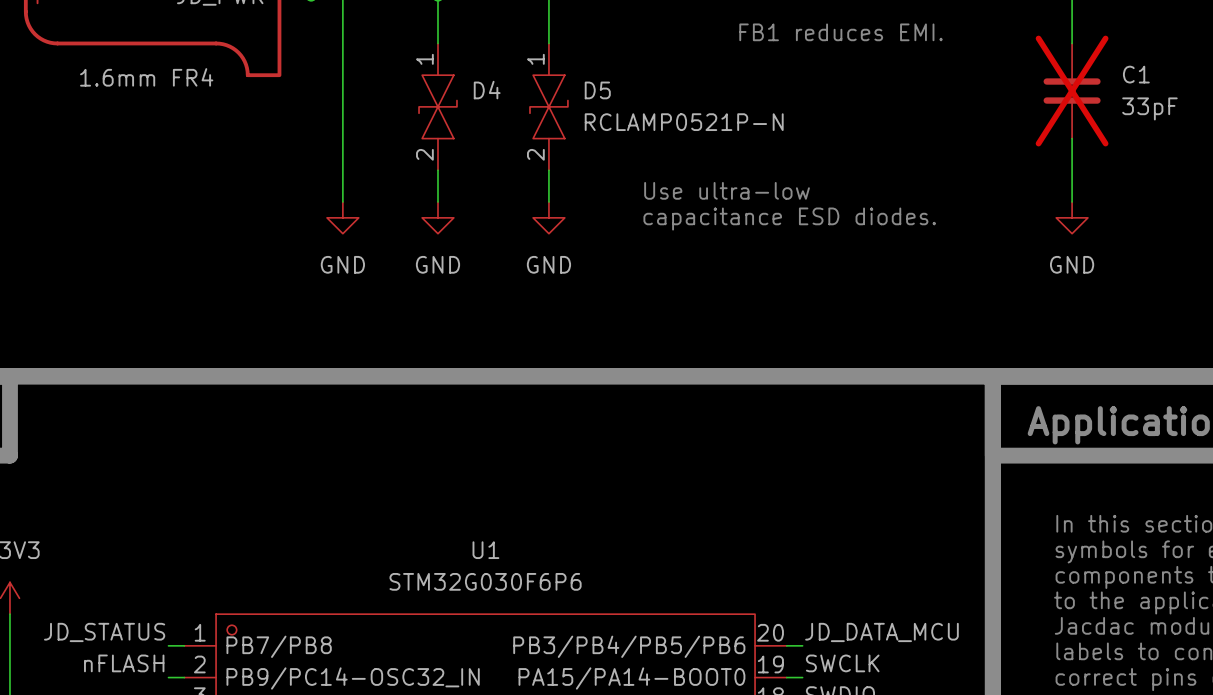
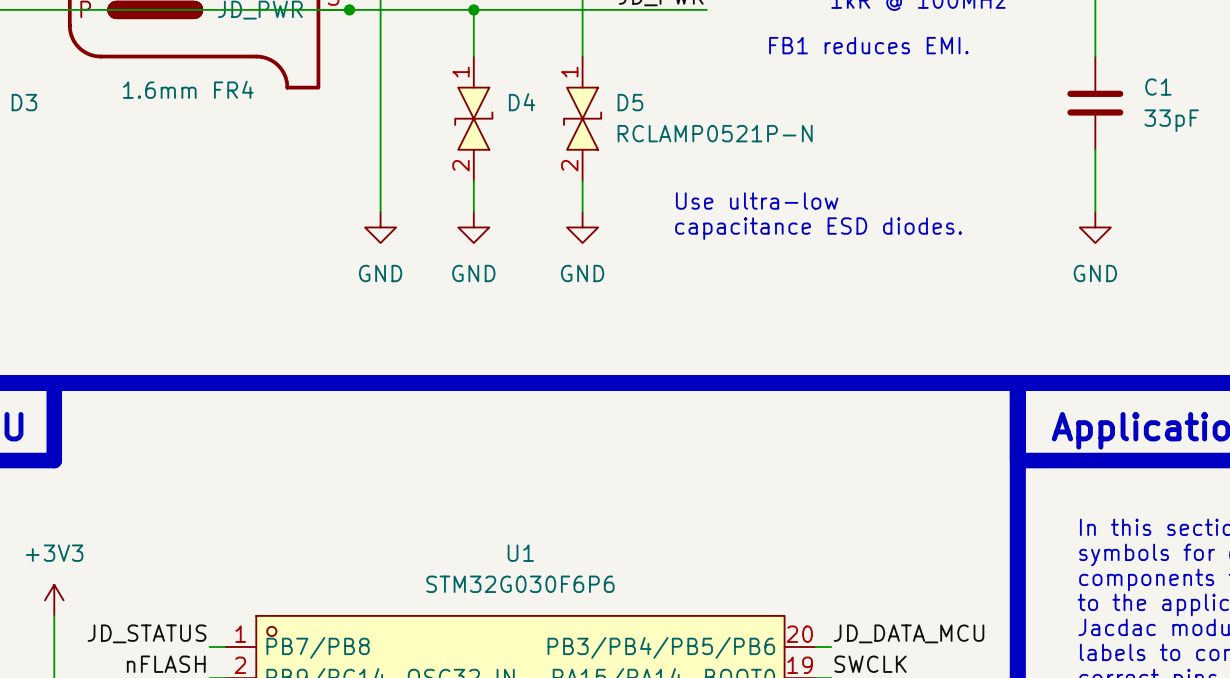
C1 do-not-place cross: (1072, 91) -> none

